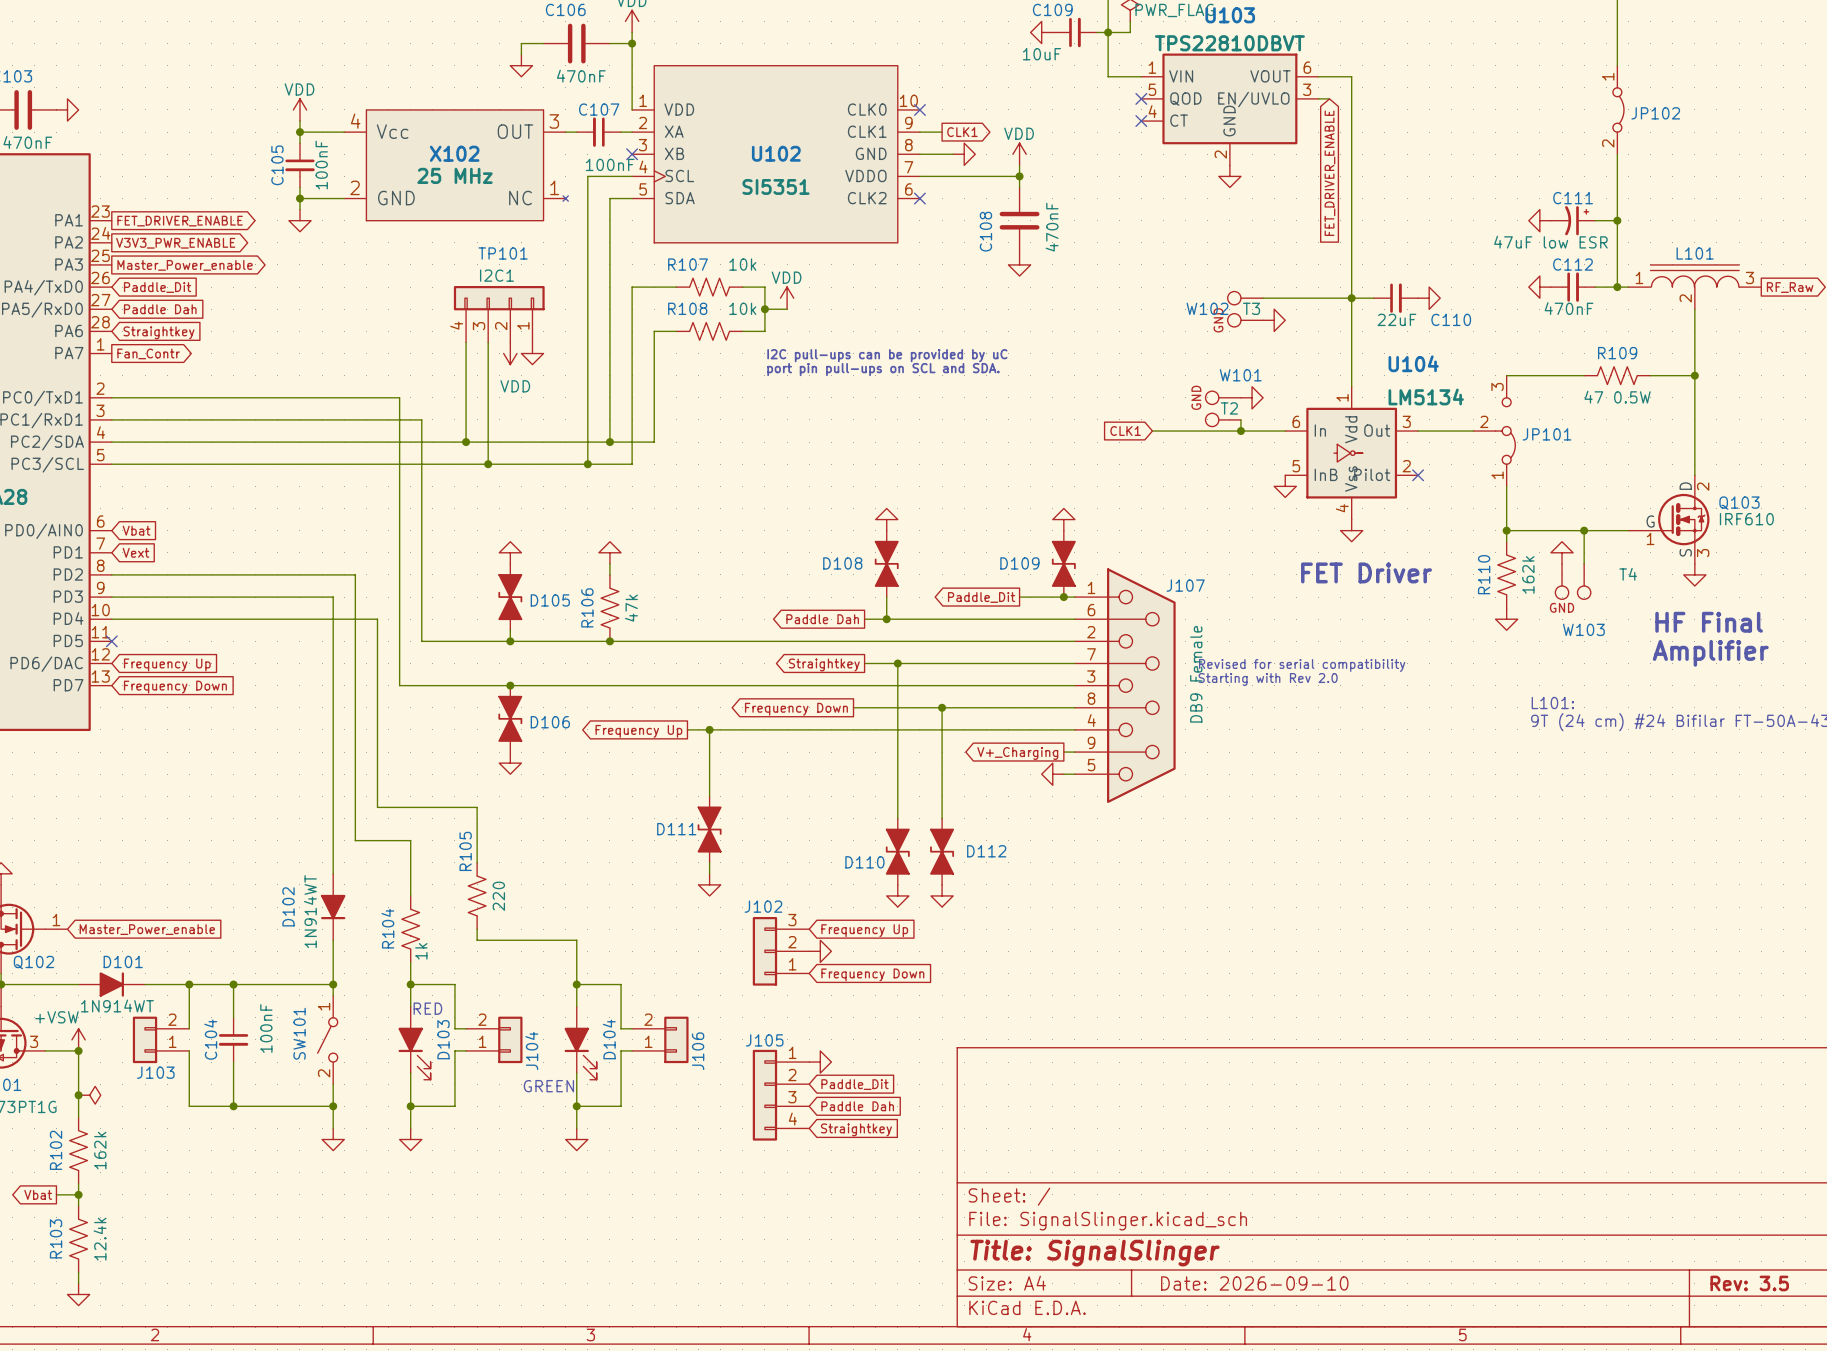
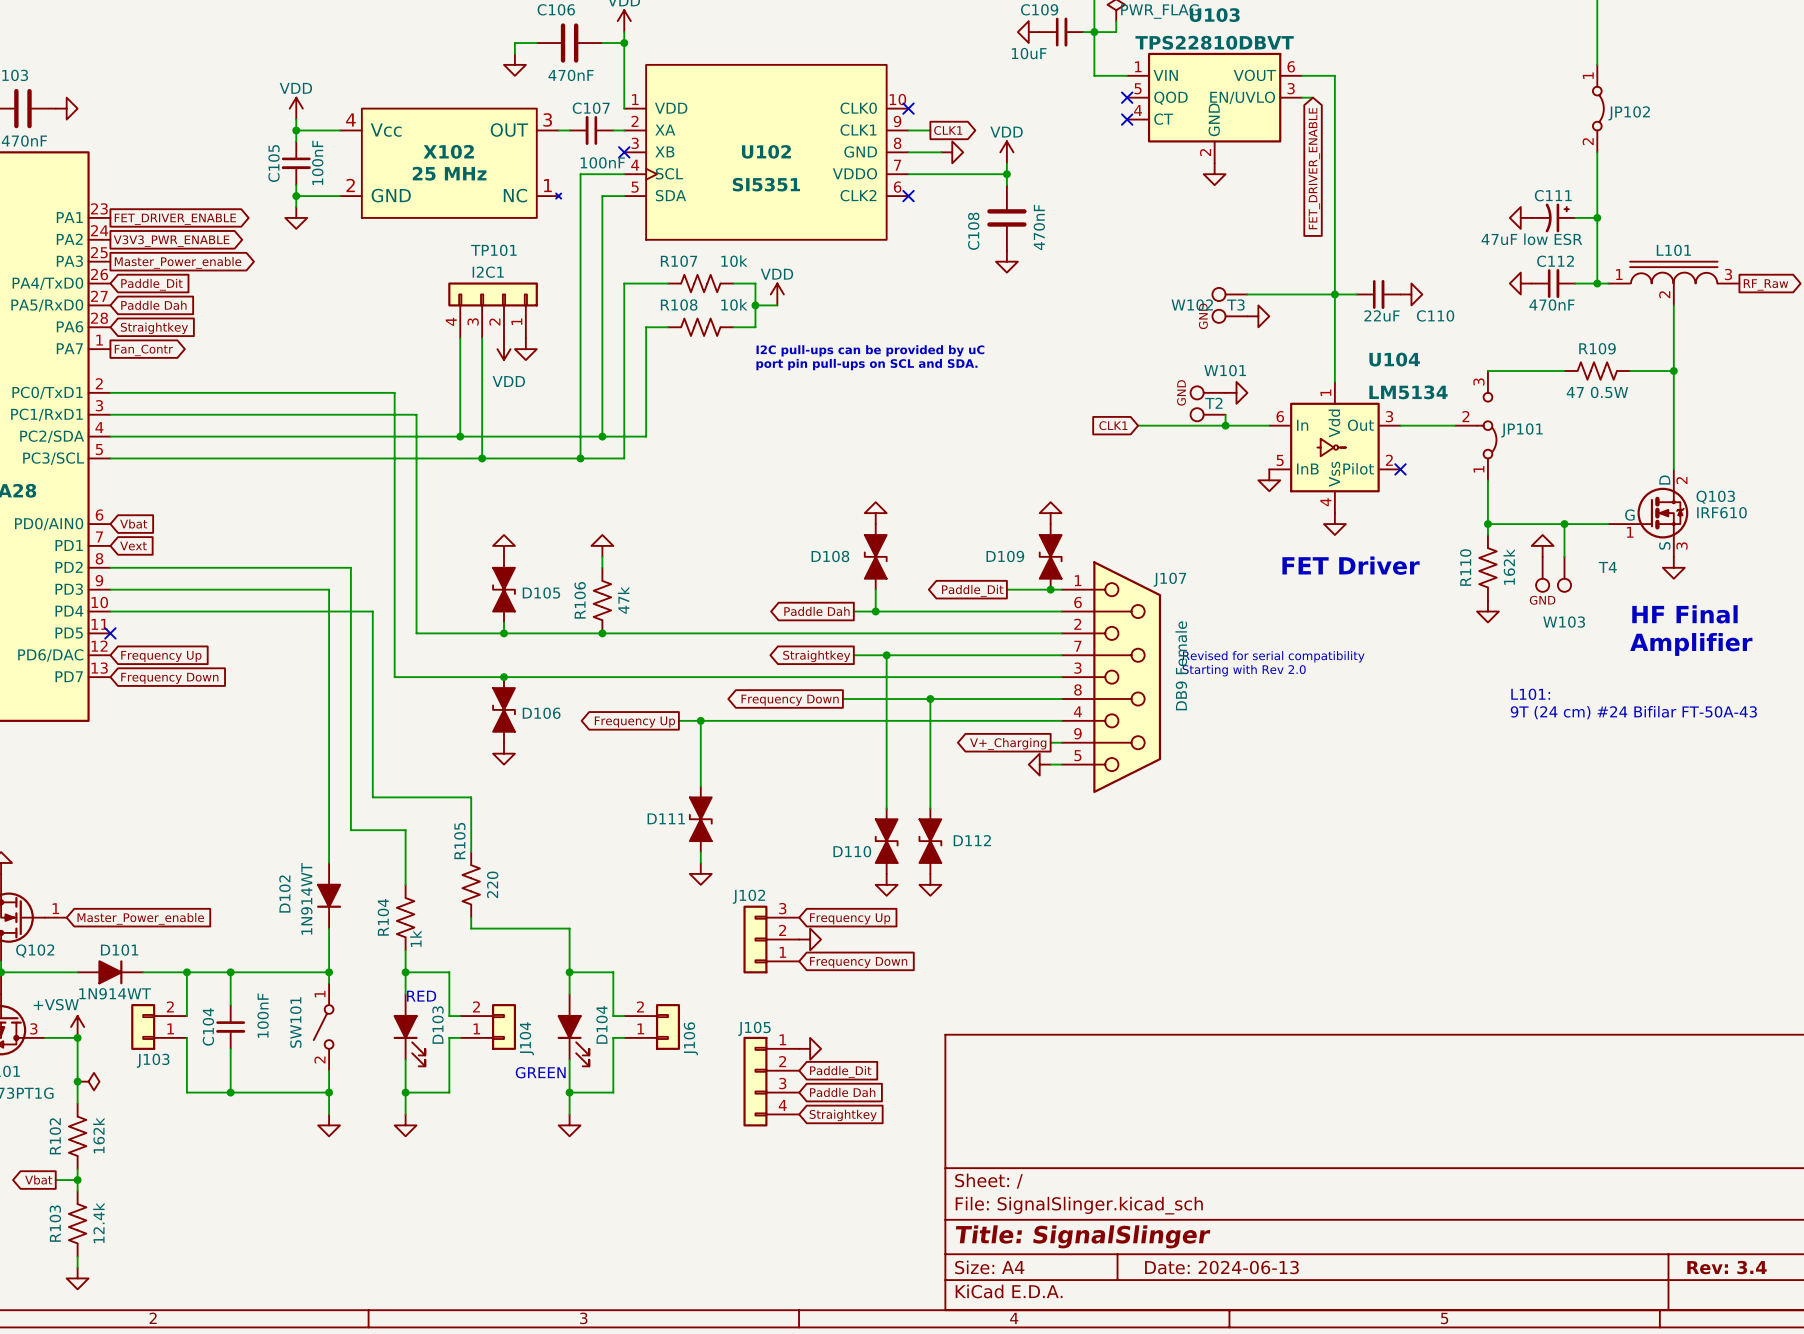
title block: Date: 2026-09-10 (1254, 1283) -> Date: 2024-06-13 (1221, 1267)
title block: Rev: 3.5 (1749, 1283) -> Rev: 3.4 (1727, 1267)

